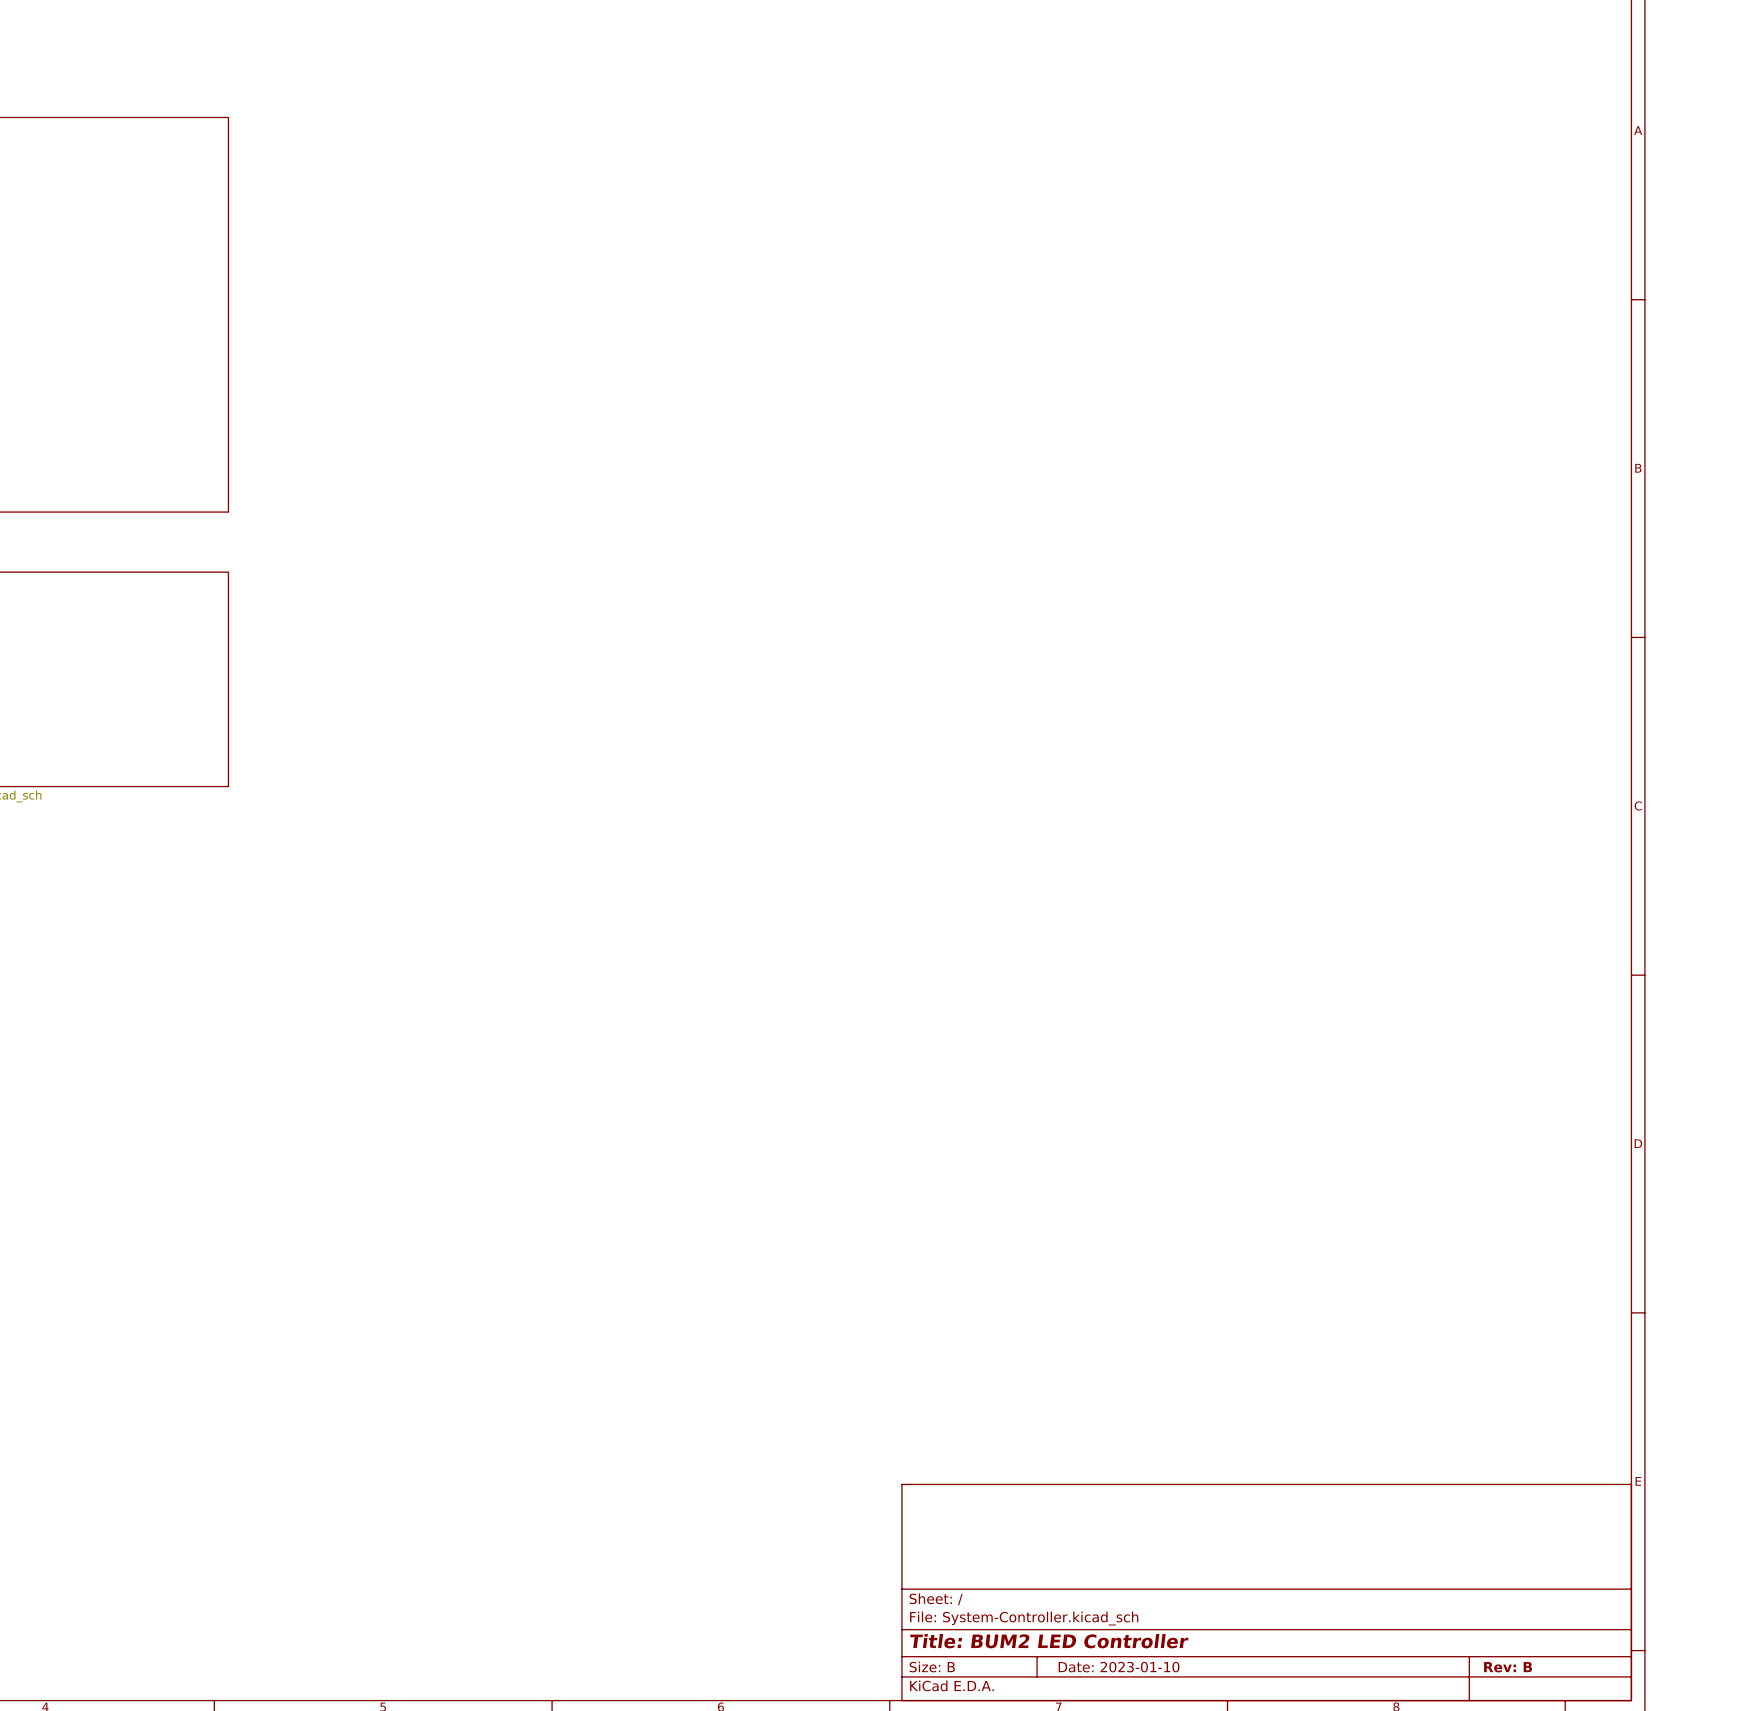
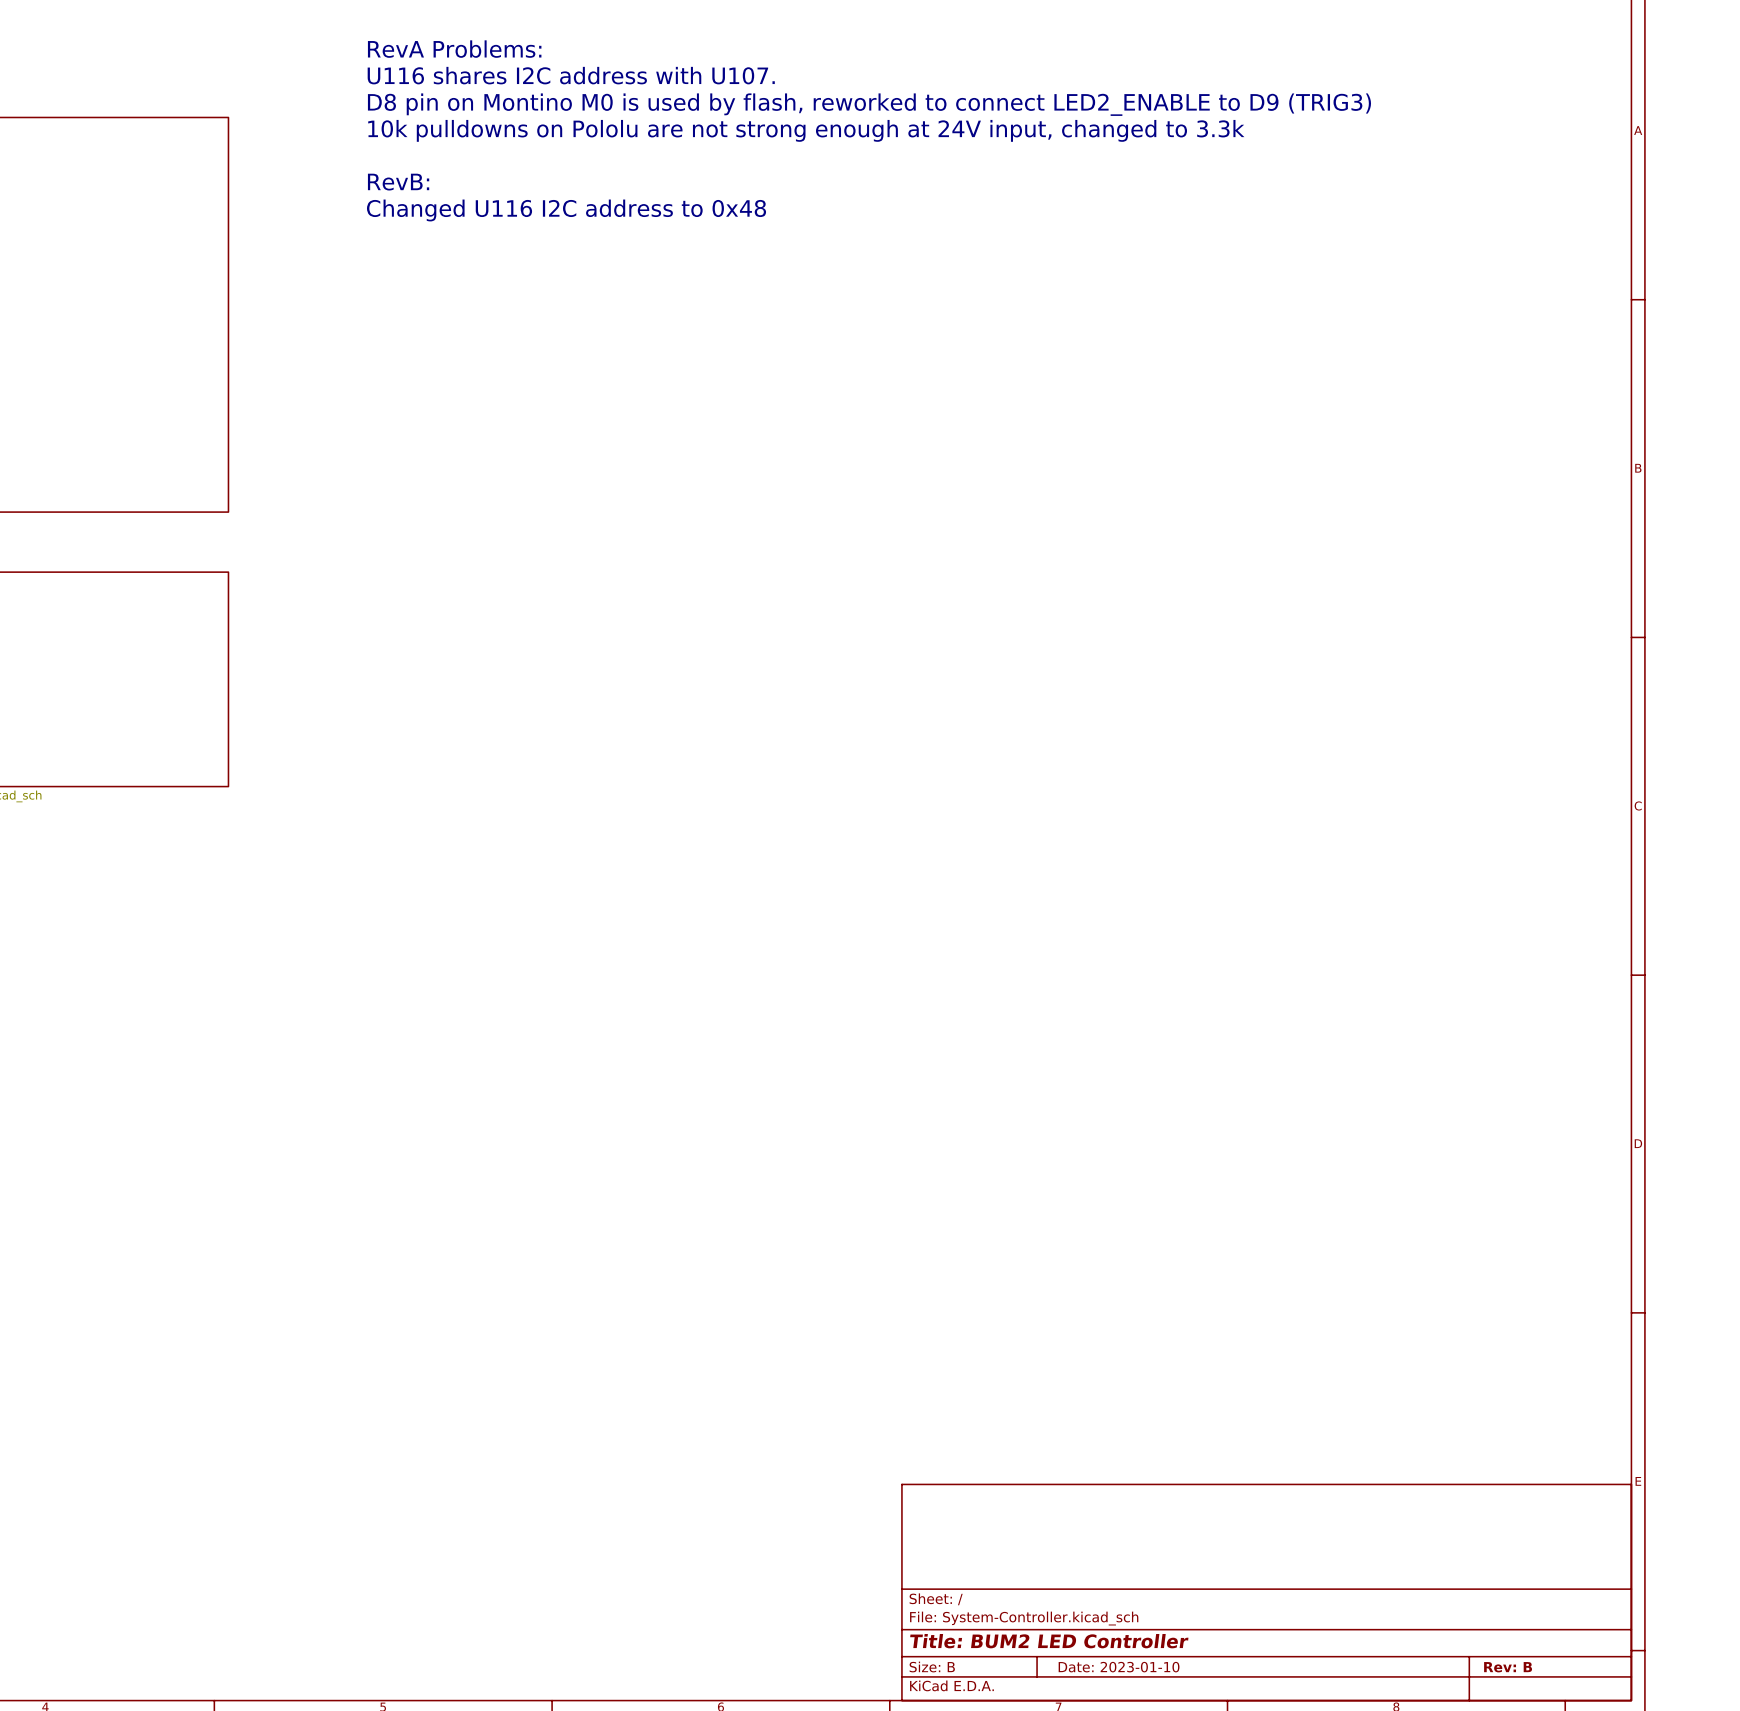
text: none -> RevA Problems: (454, 49)
text: none -> U116 shares I2C address with U107. (571, 75)
text: none -> D8 pin on Montino M0 is used by flash, reworked to connect LED2_ENABLE to D9 (TRIG3) (869, 104)
text: none -> 10k pulldowns on Pololu are not strong enough at 24V input, changed to 3.3k (806, 130)
text: none -> RevB: (398, 182)
text: none -> Changed U116 I2C address to 0x48 (566, 210)

